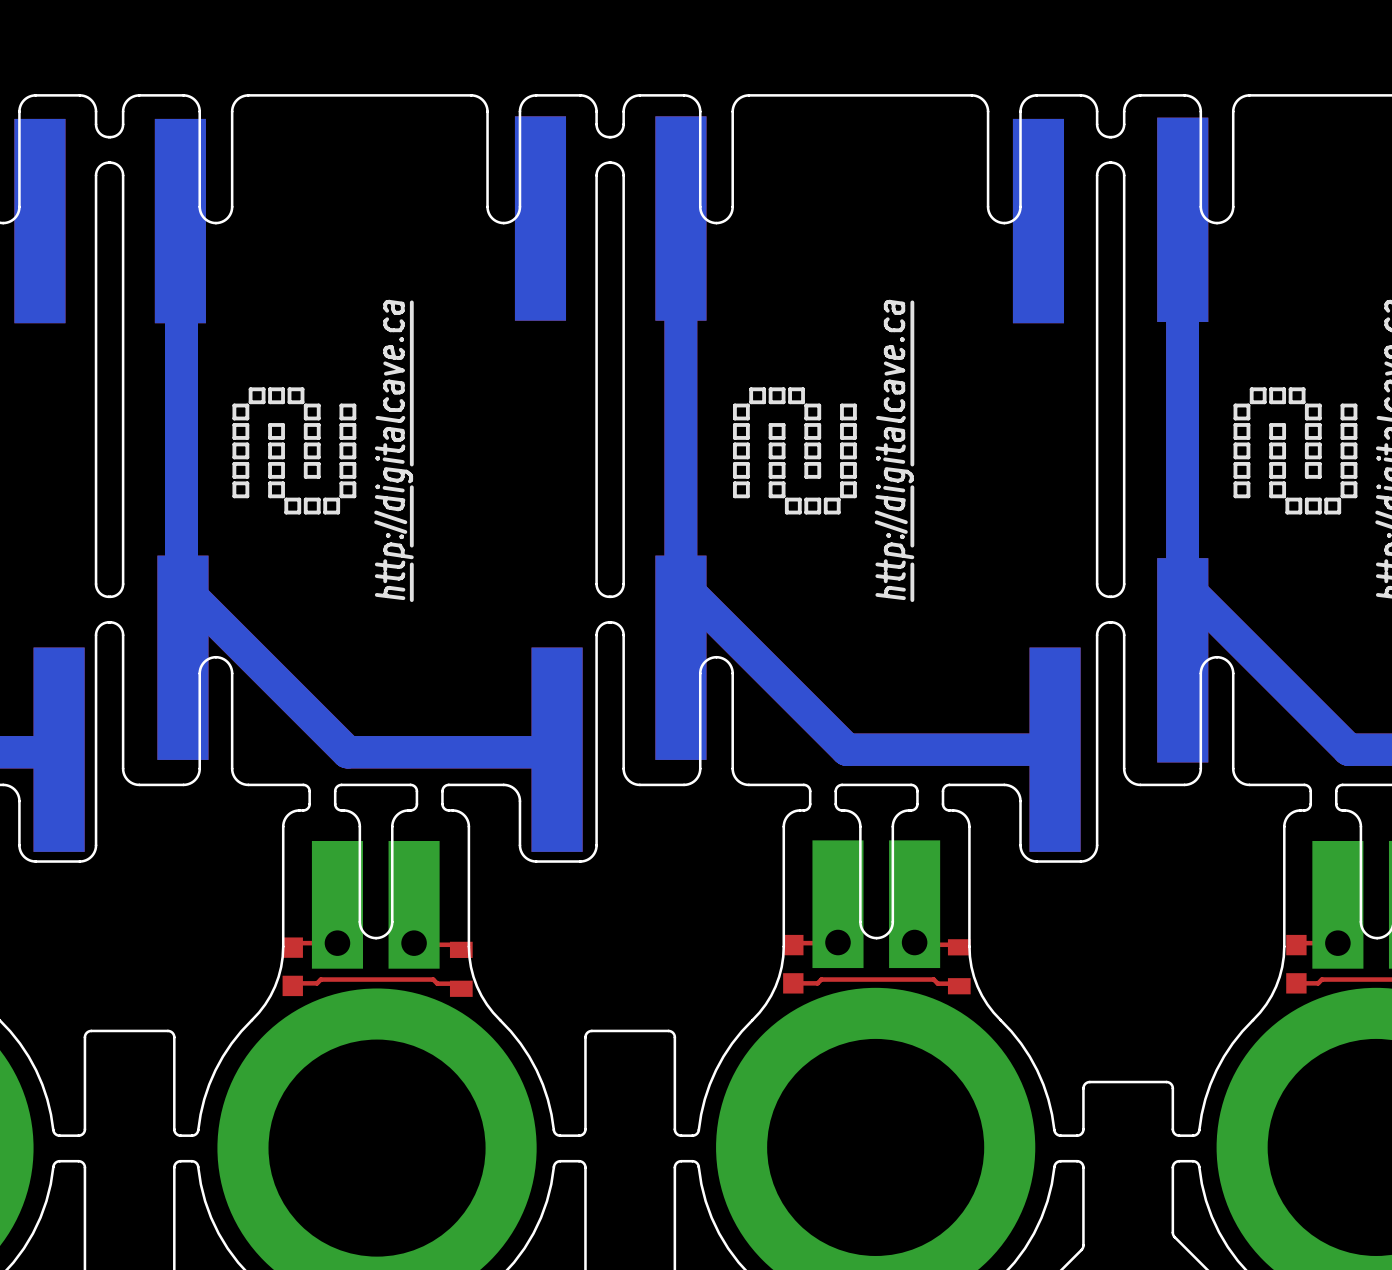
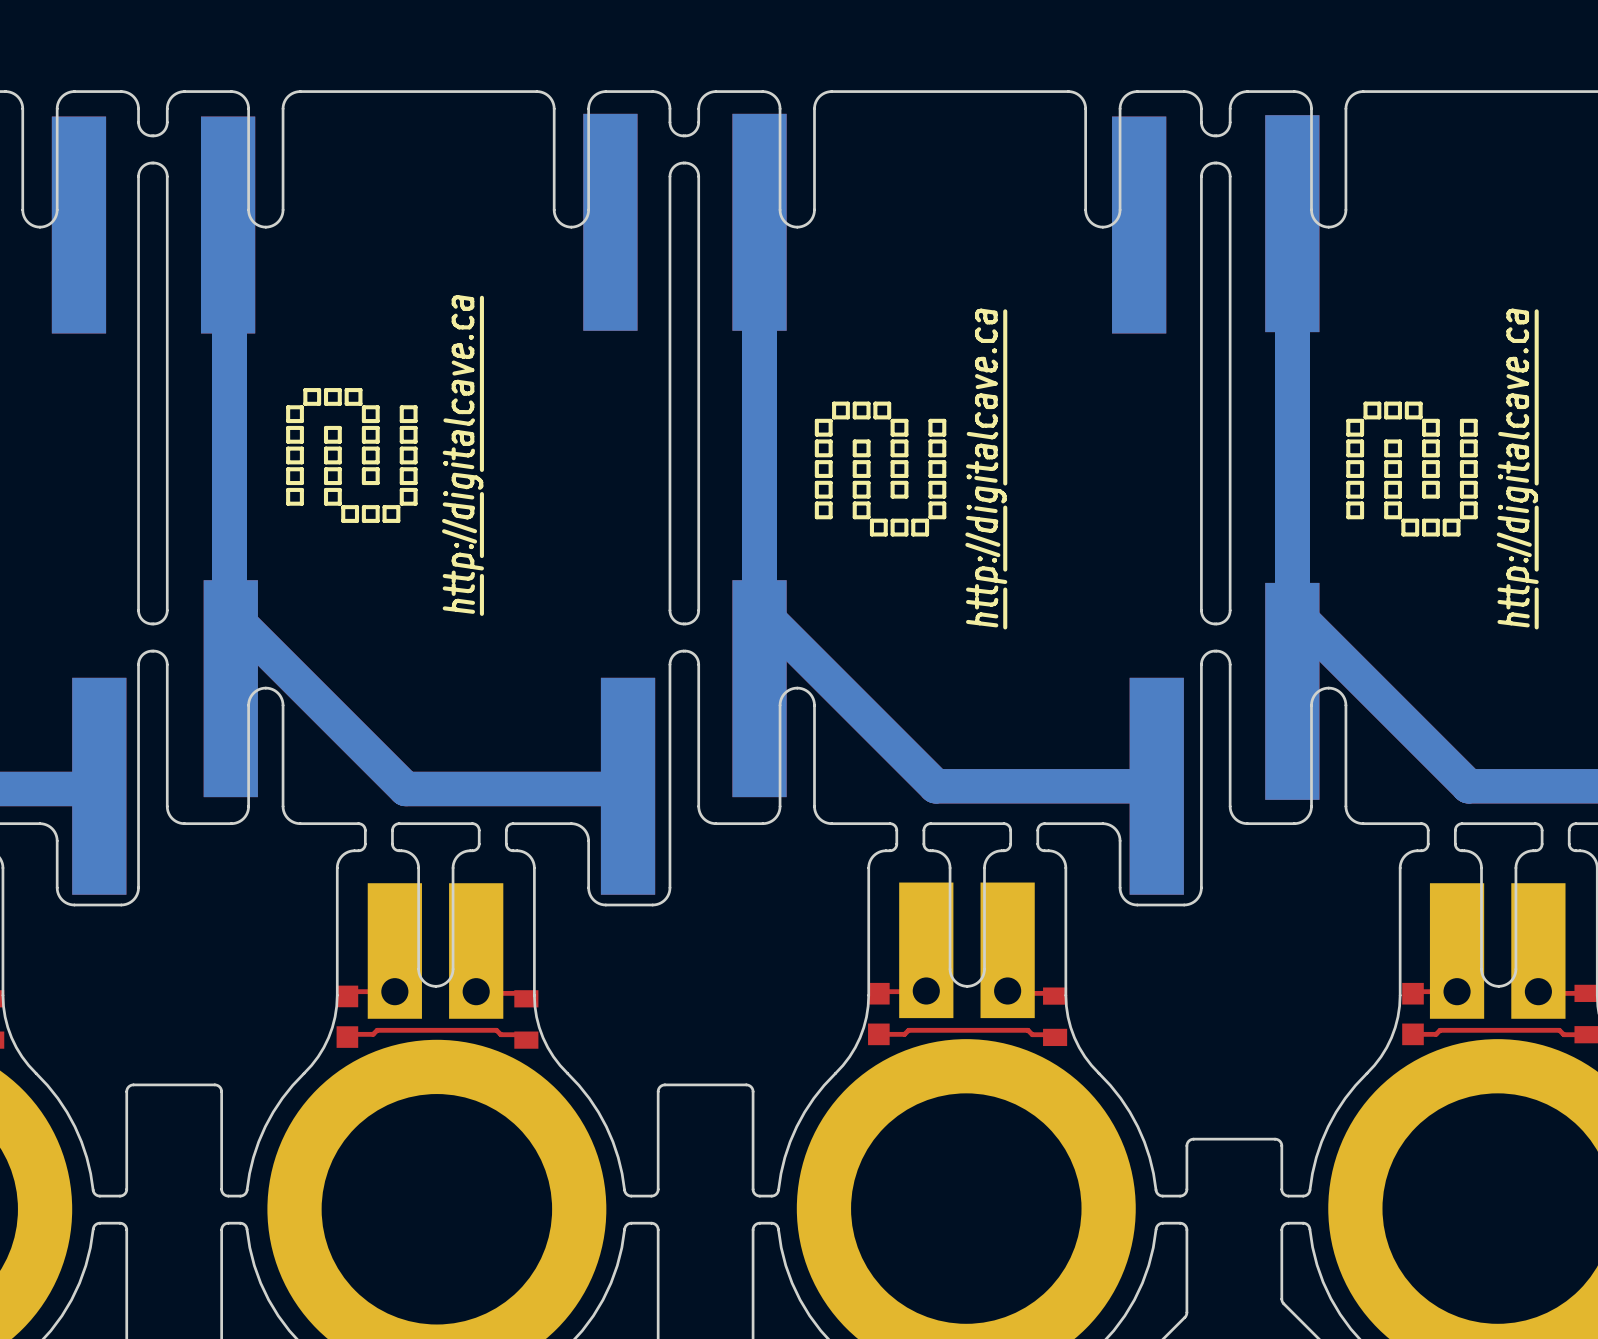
drawing position: (294, 450) -> (351, 455)
drawing position: (393, 450) -> (463, 455)

